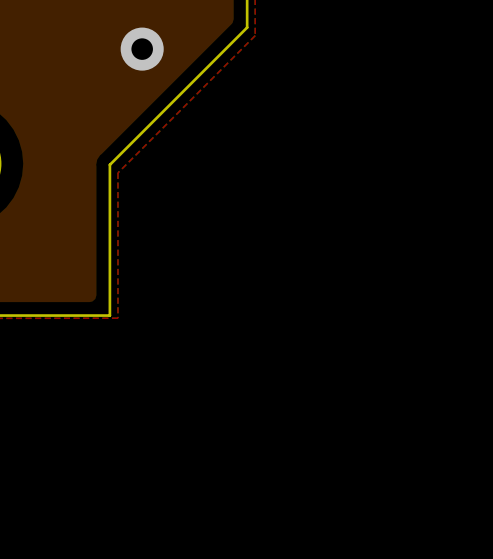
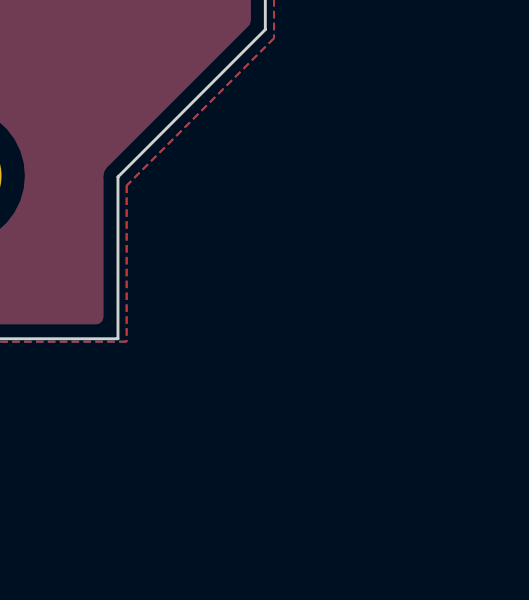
via: (142, 49) -> none

